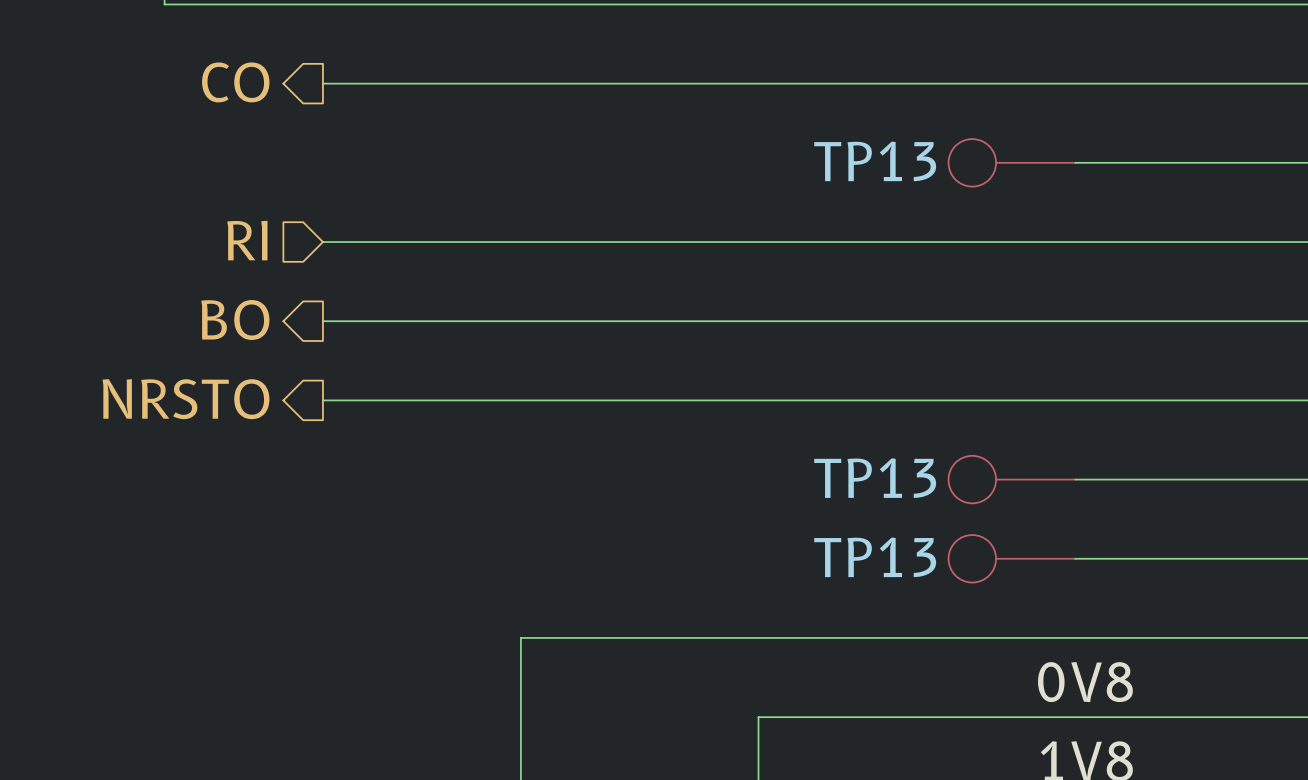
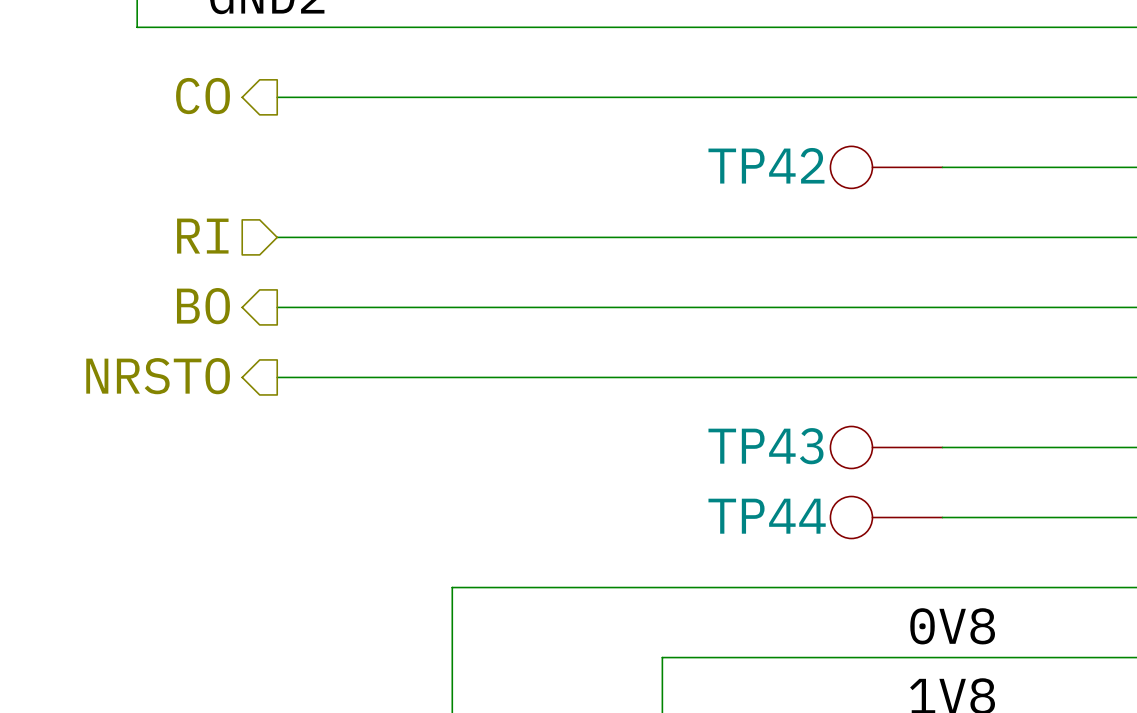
TP13 name: TP13 (875, 161) -> TP42 (766, 165)
TP13 name: TP13 (875, 478) -> TP43 (765, 446)
TP13 name: TP13 (875, 557) -> TP44 (767, 516)

